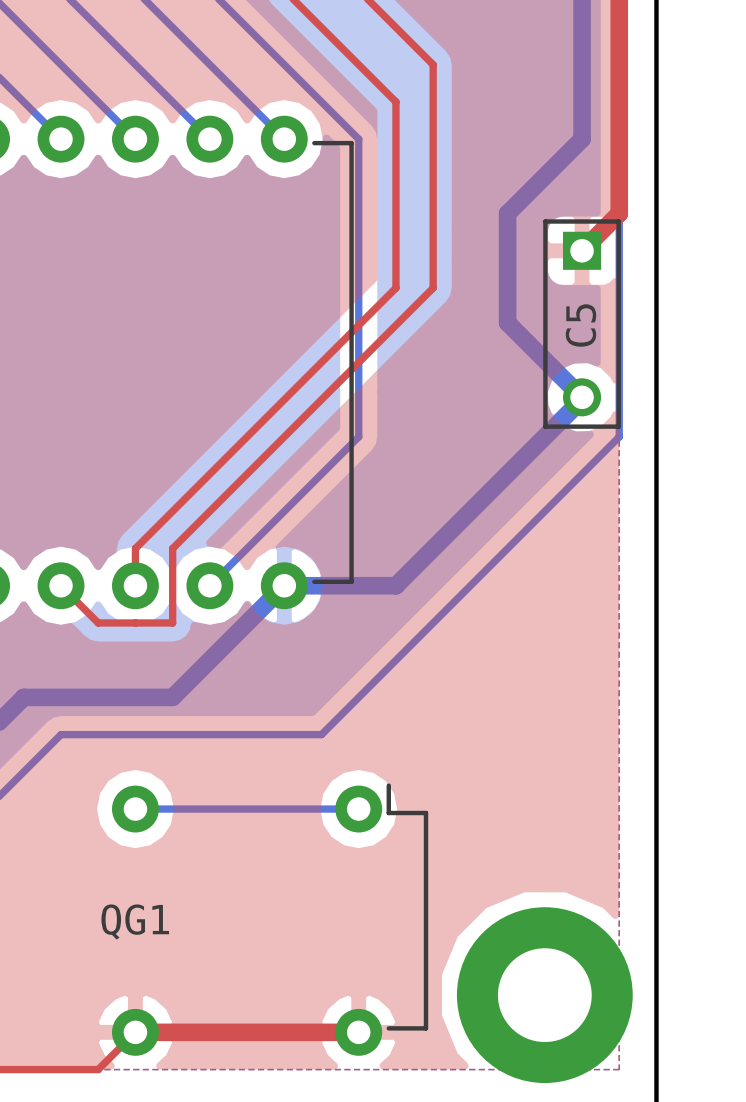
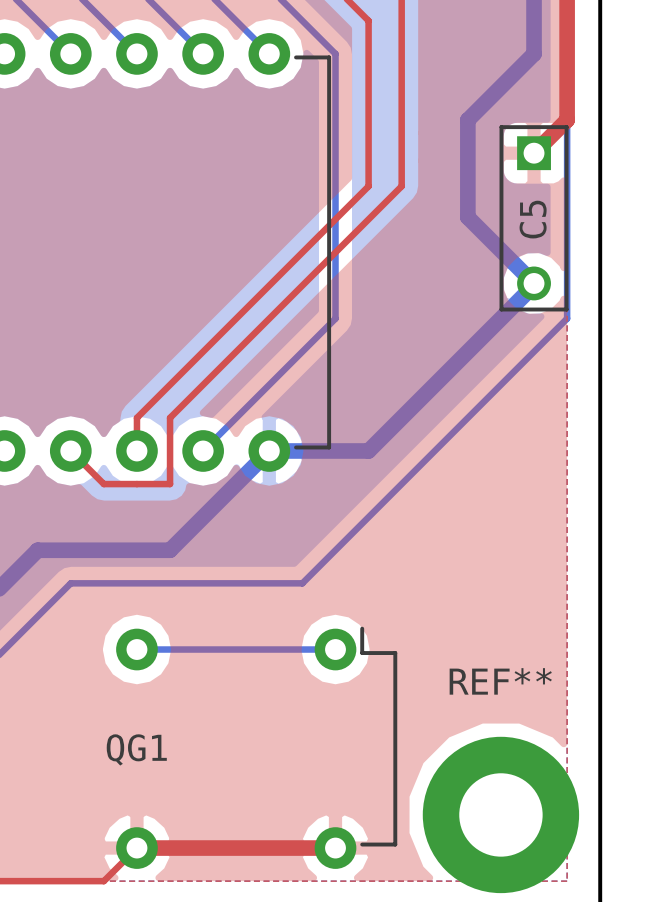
REF** name: none -> REF** (500, 681)

